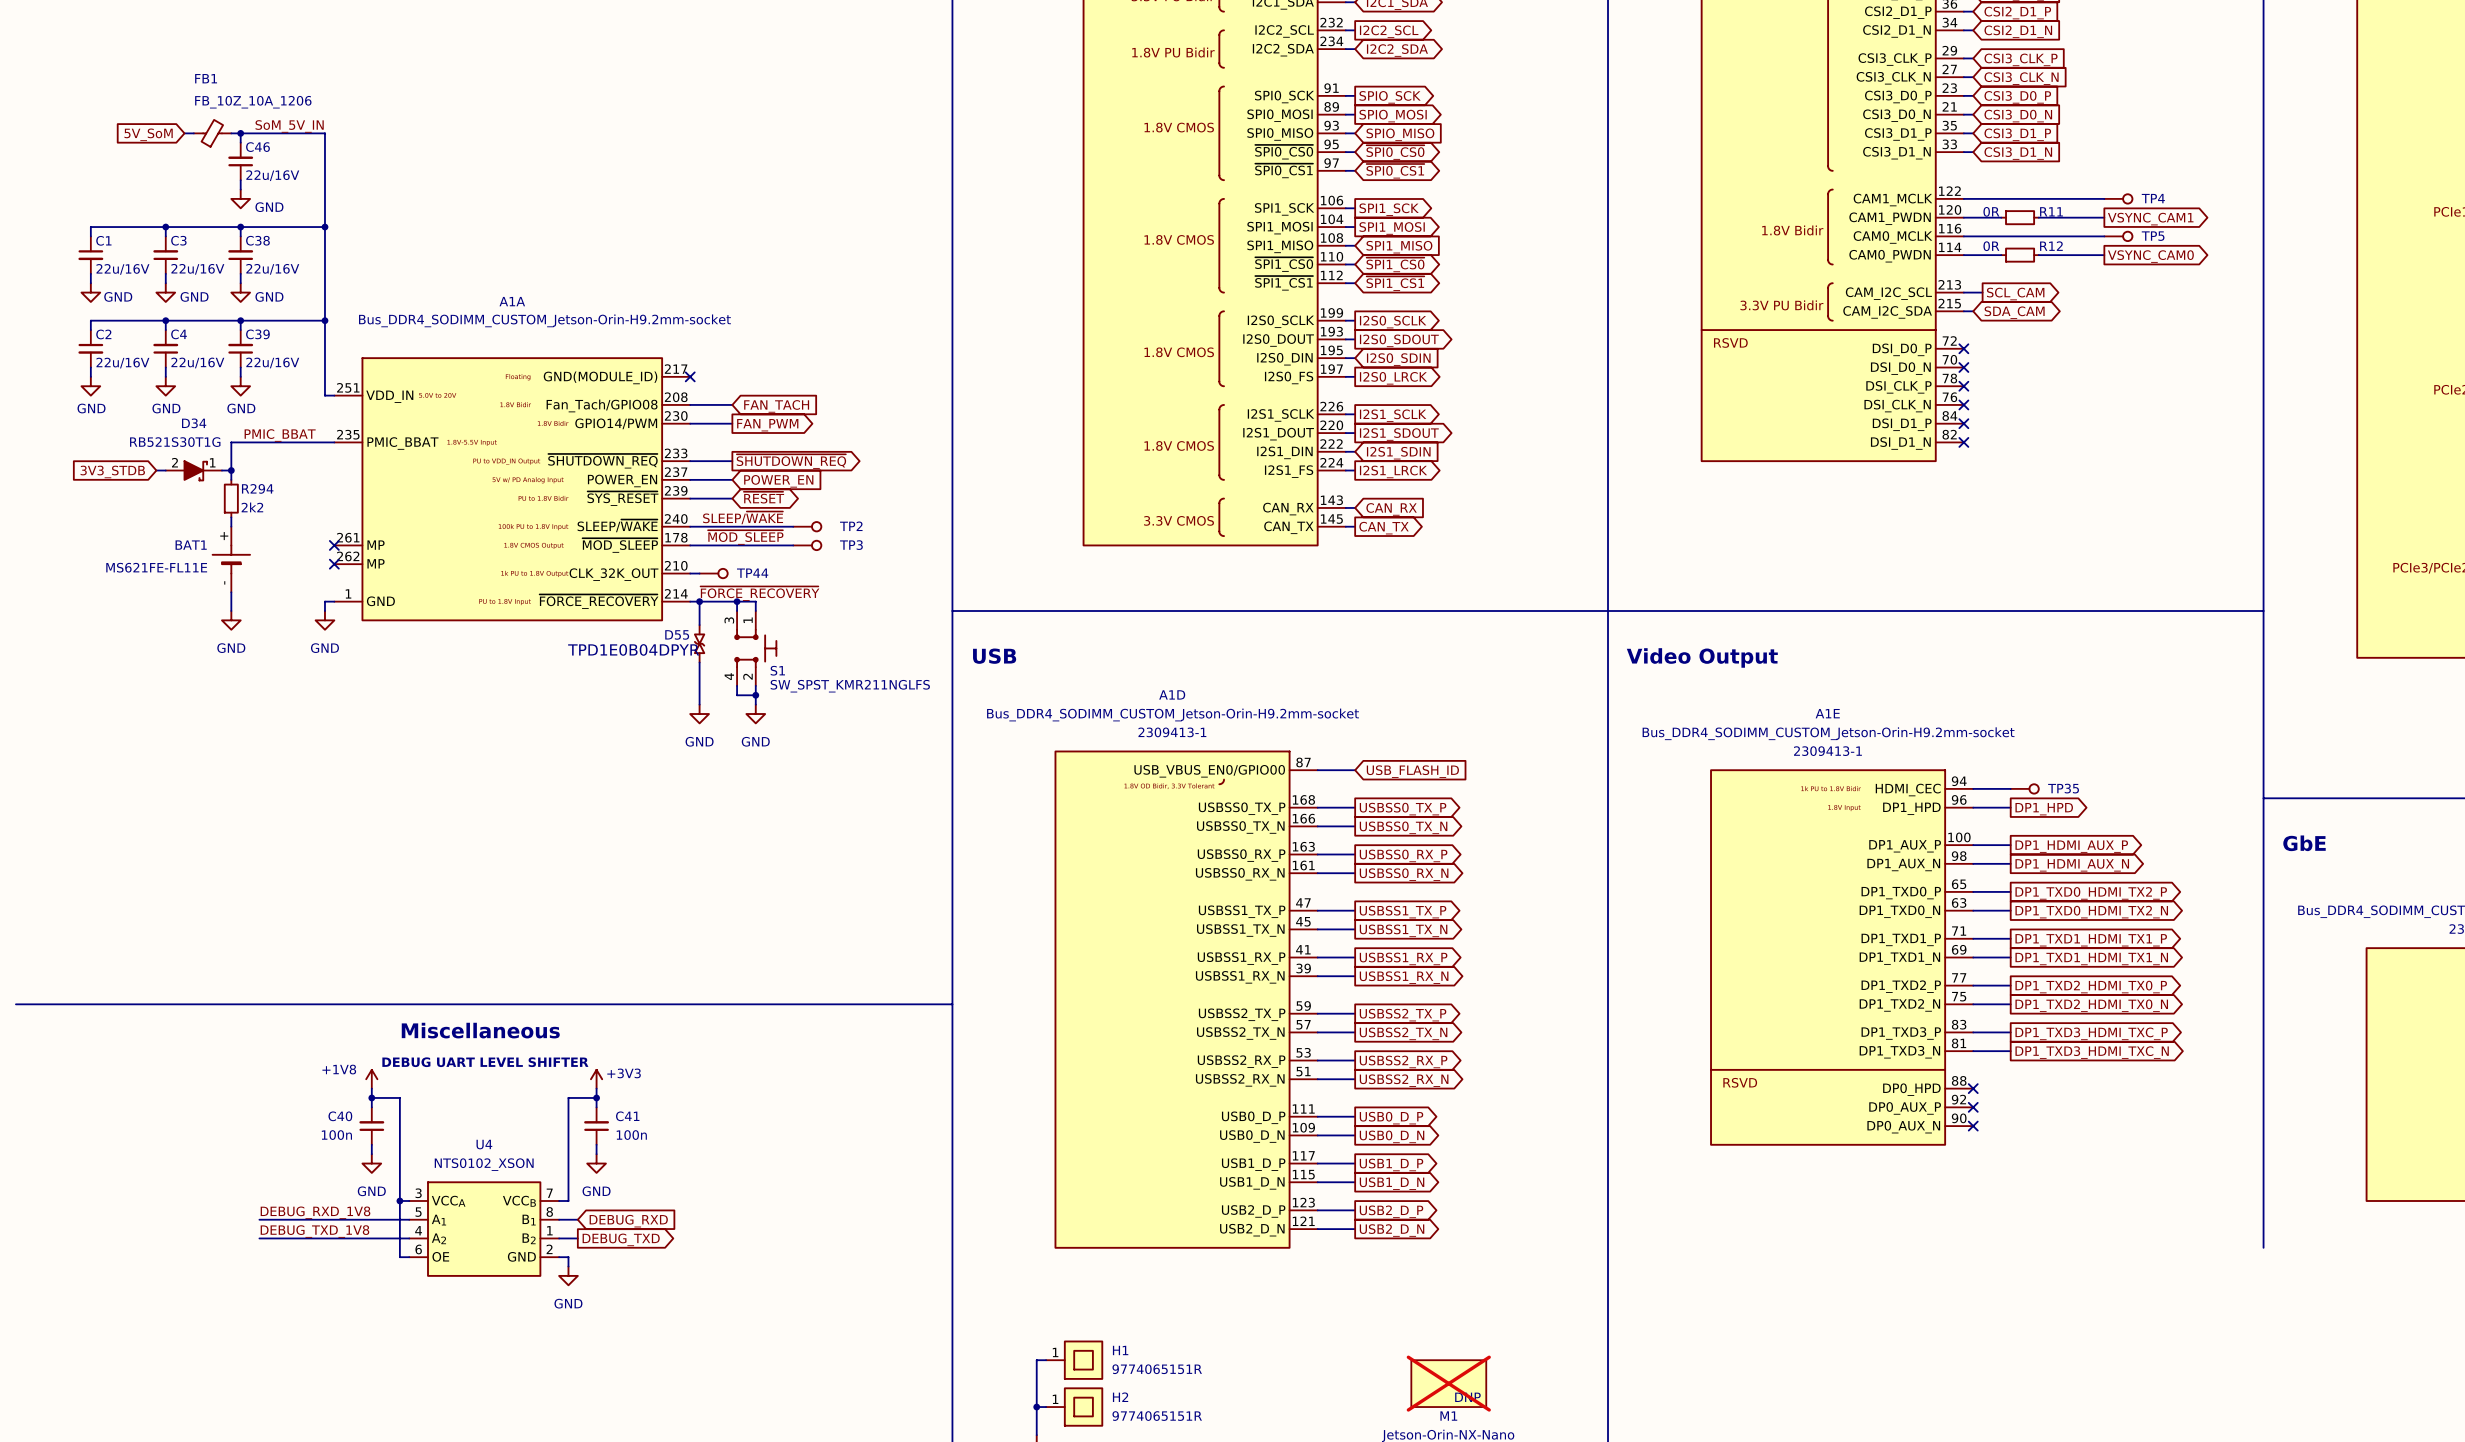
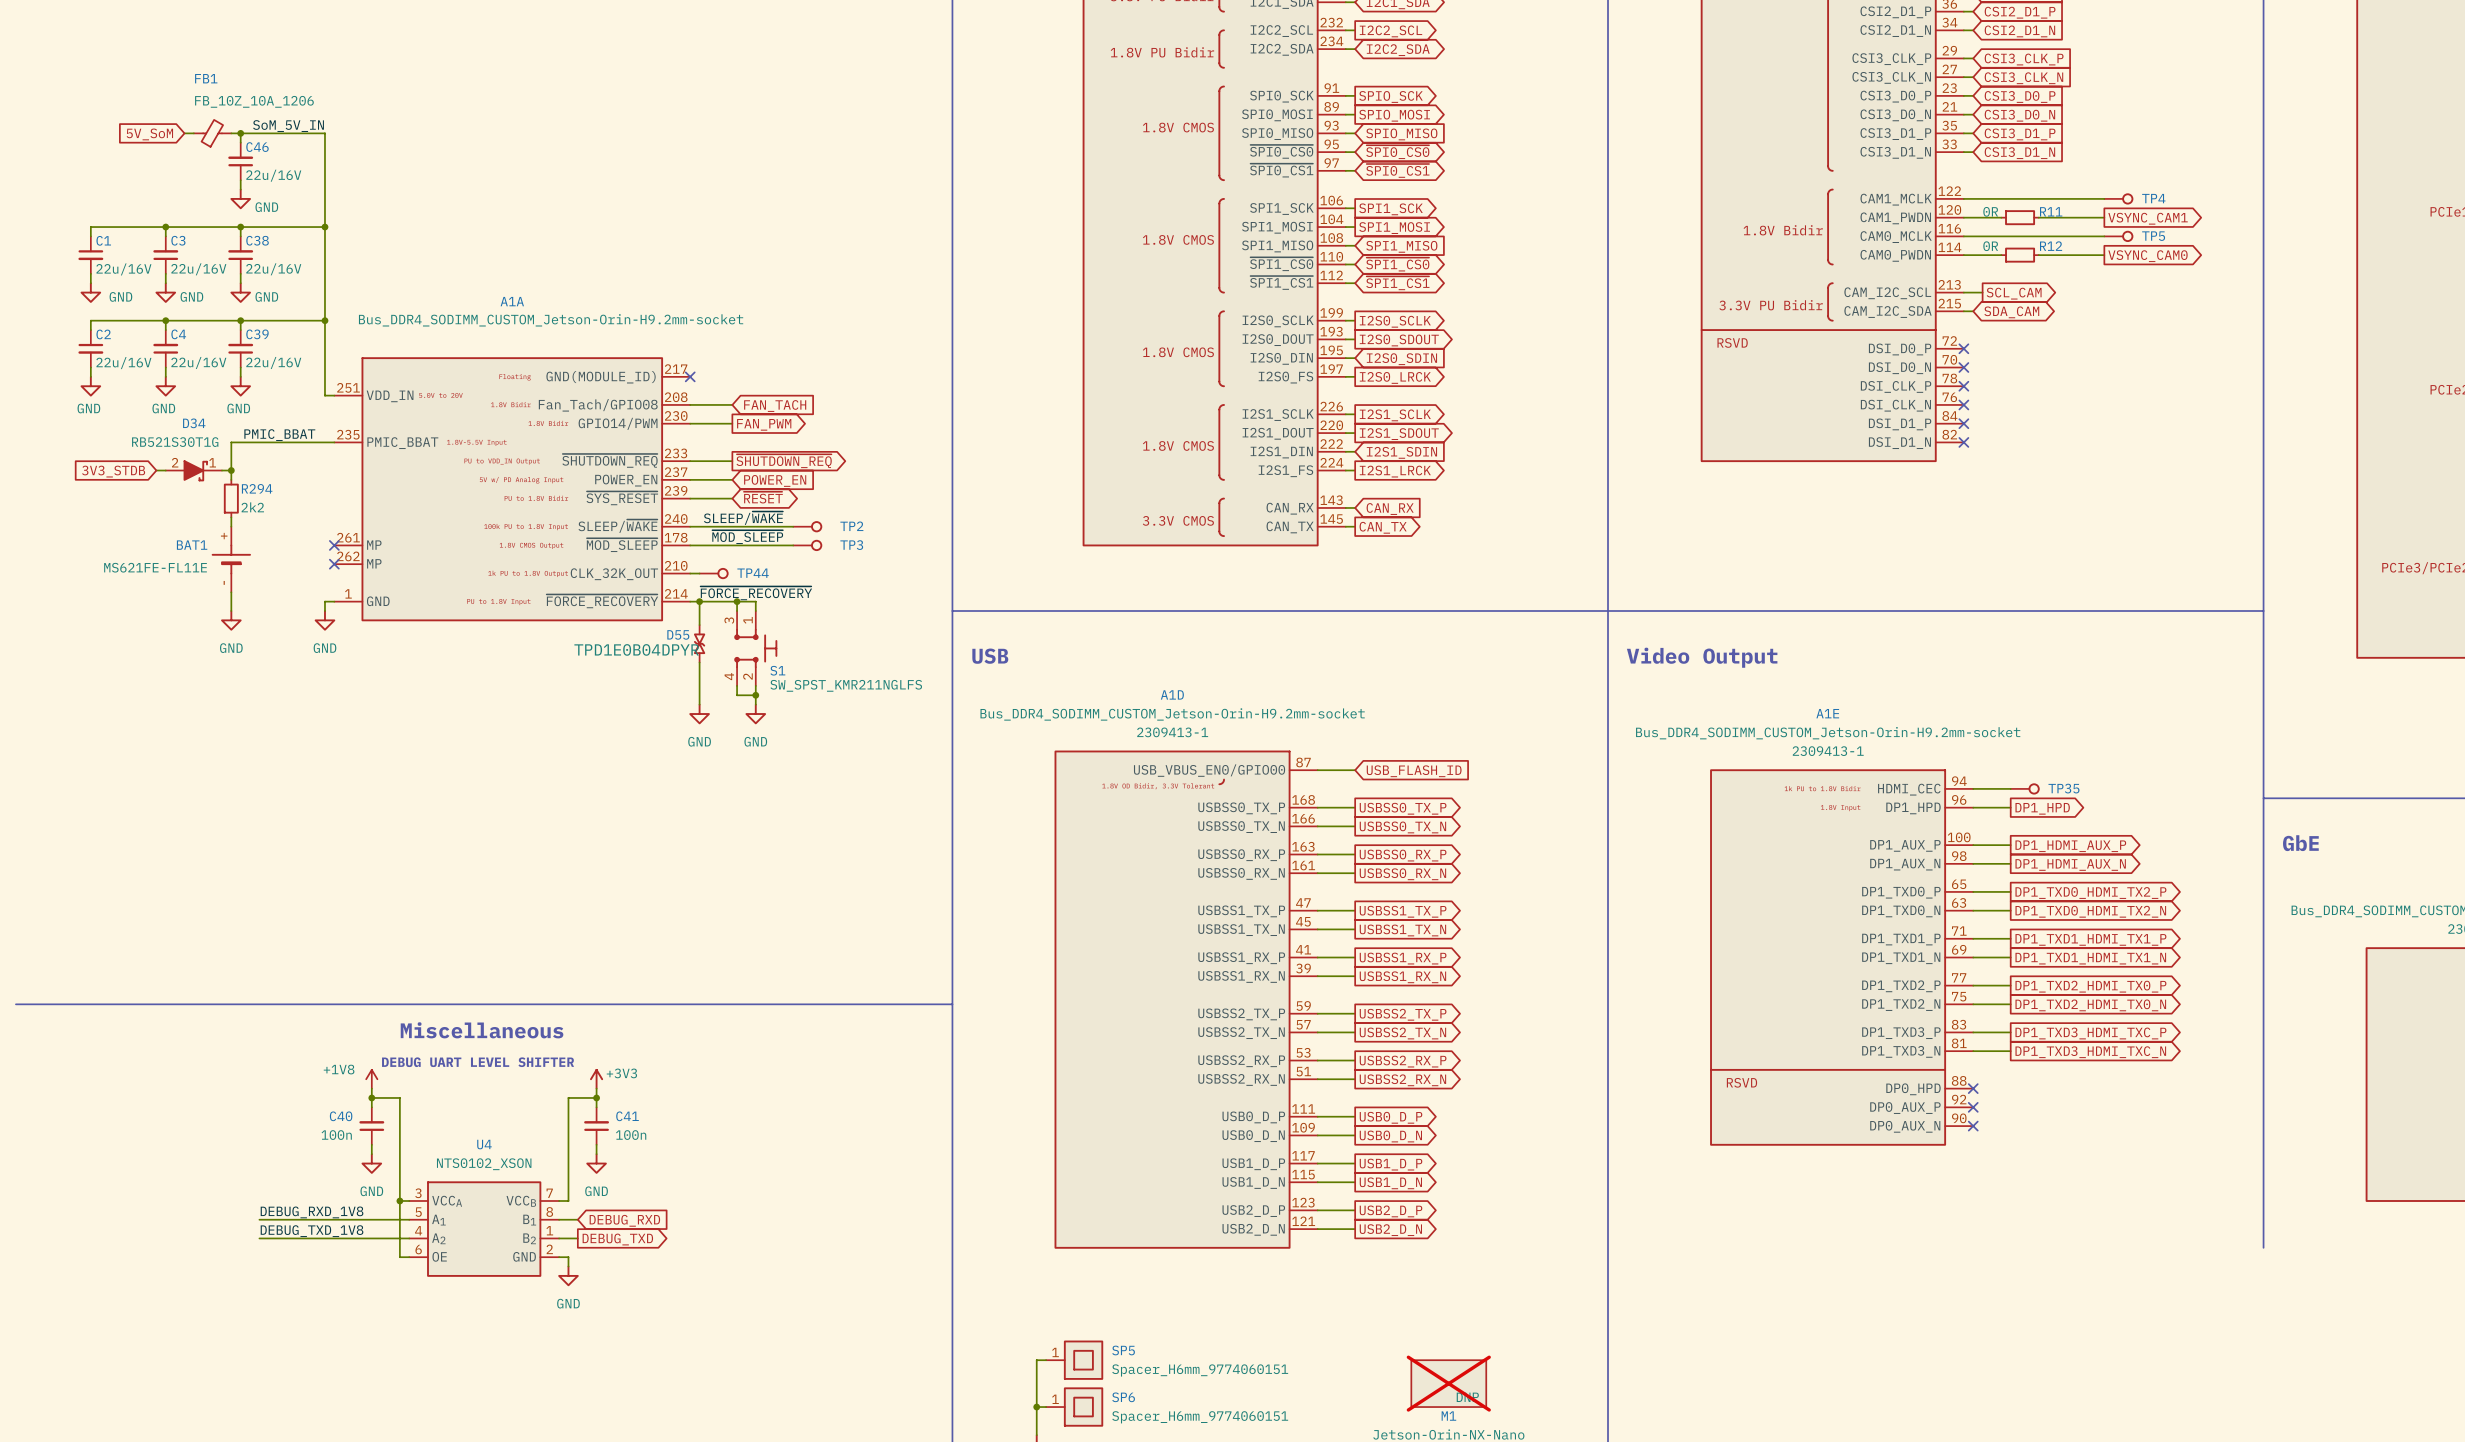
H1 name: H1 (1120, 1350) -> SP5 (1123, 1350)
H1 text: 9774065151R (1157, 1369) -> none
H1 value: none -> Spacer_H6mm_9774060151 (1200, 1370)
H2 name: H2 (1120, 1397) -> SP6 (1123, 1397)
H2 text: 9774065151R (1157, 1416) -> none
H2 value: none -> Spacer_H6mm_9774060151 (1200, 1417)

